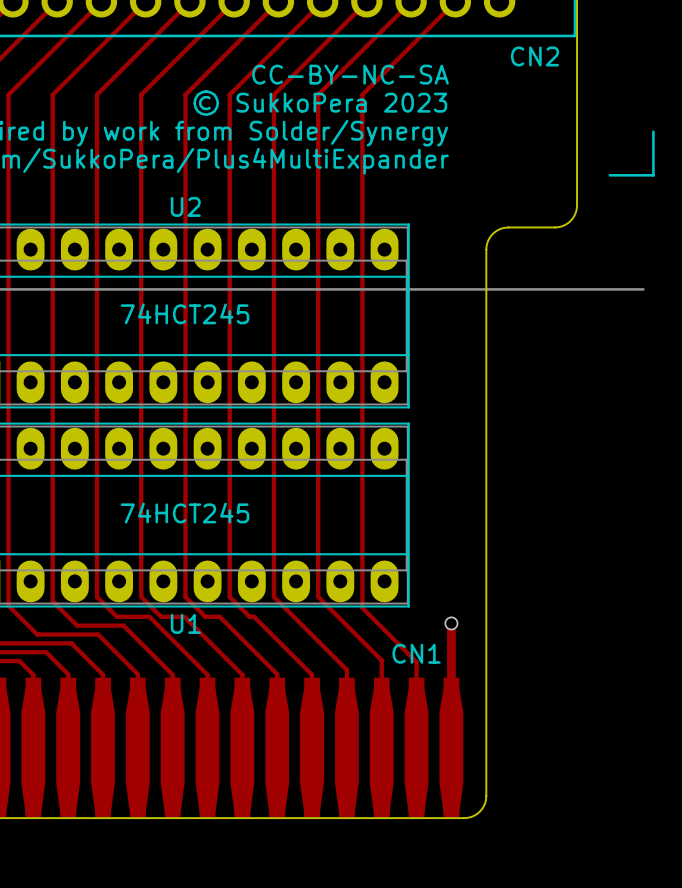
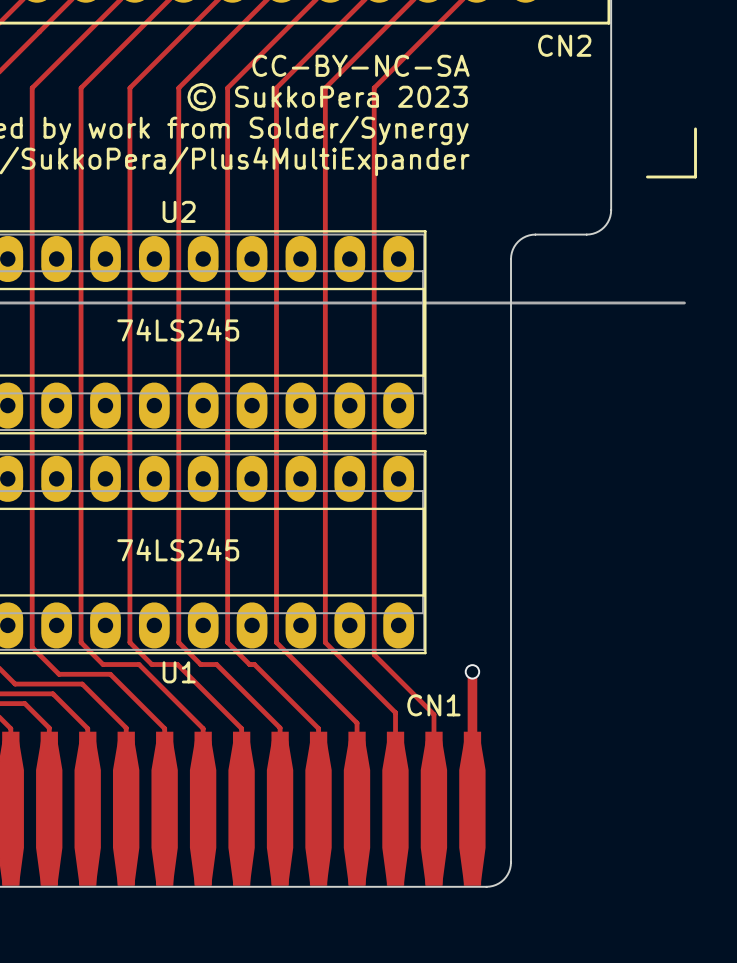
U2 value: 74HCT245 (184, 313) -> 74LS245 (178, 330)
U1 value: 74HCT245 (184, 512) -> 74LS245 (178, 549)

